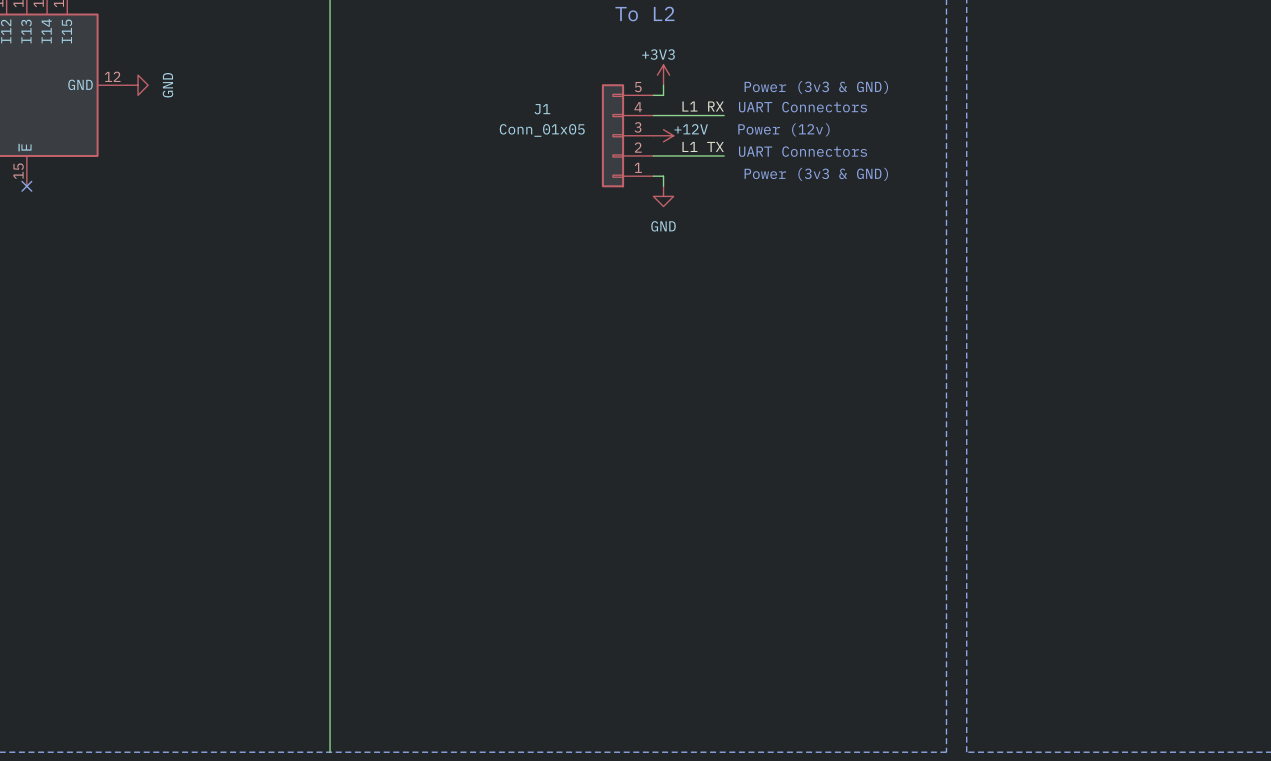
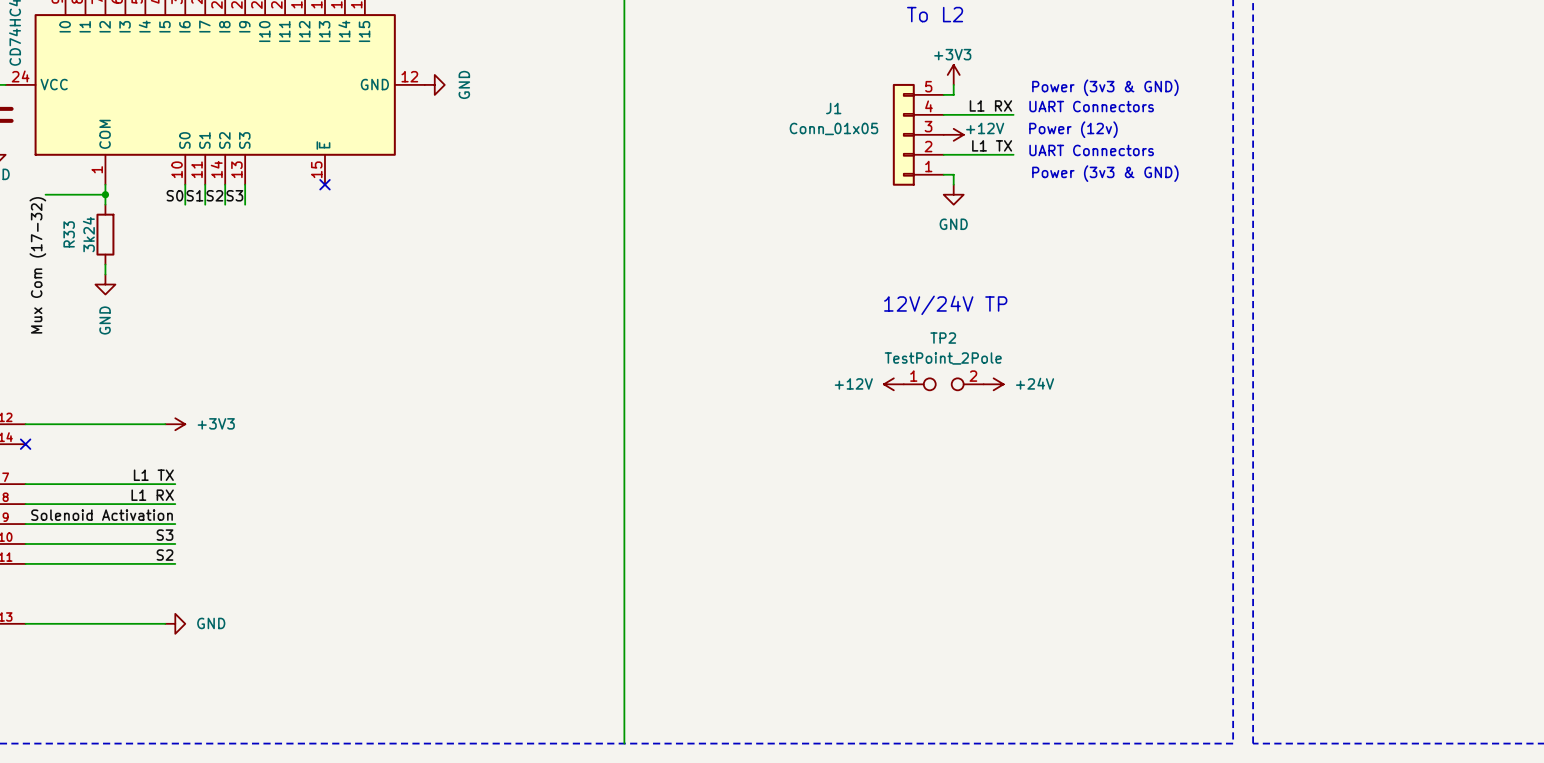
text: none -> 12V/24V TP (945, 305)
power symbol: none -> +12V (893, 384)
TP2: none -> TestPoint_2Pole (943, 384)
power symbol: none -> +24V (993, 384)

